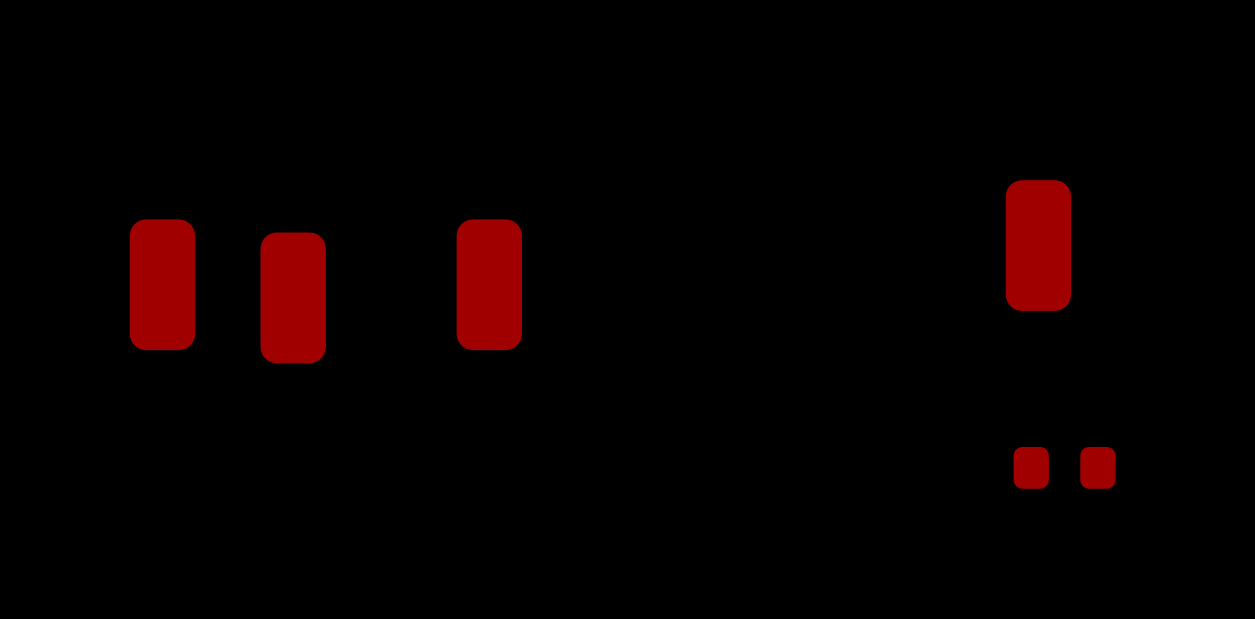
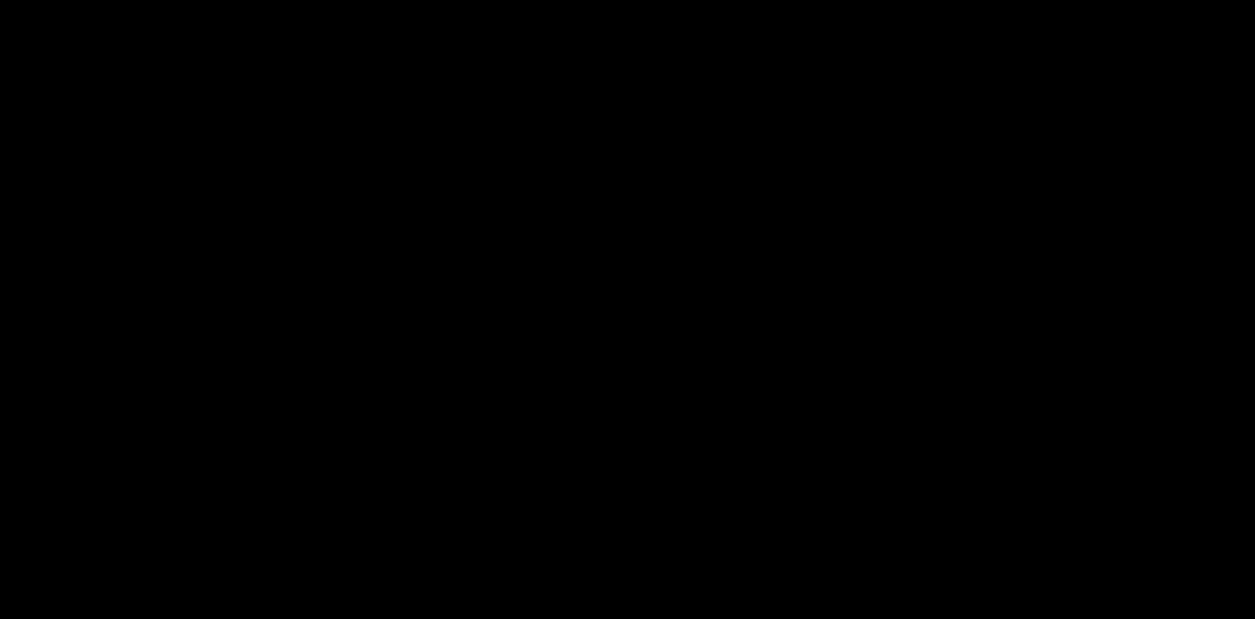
part: (1038, 245) -> none
part: (162, 284) -> none
part: (489, 284) -> none
part: (293, 297) -> none
part: (1064, 467) -> none

